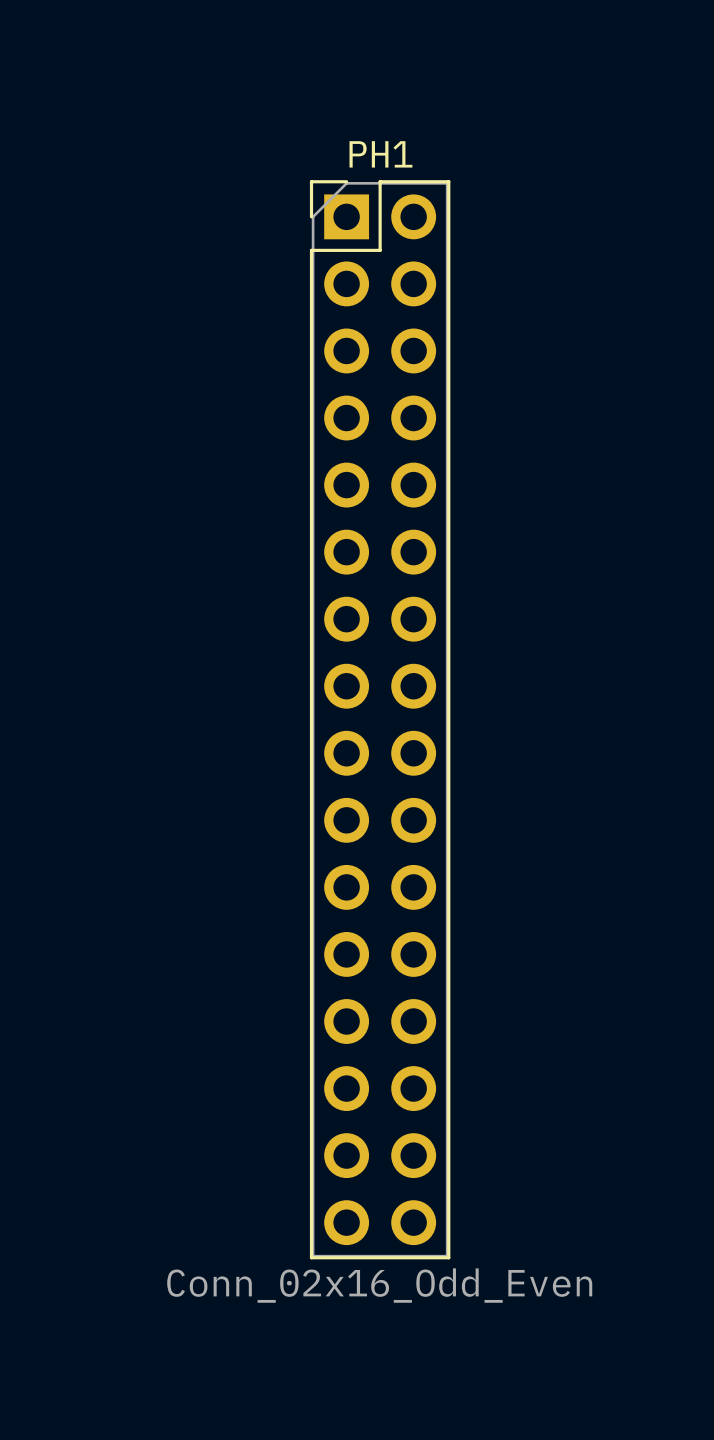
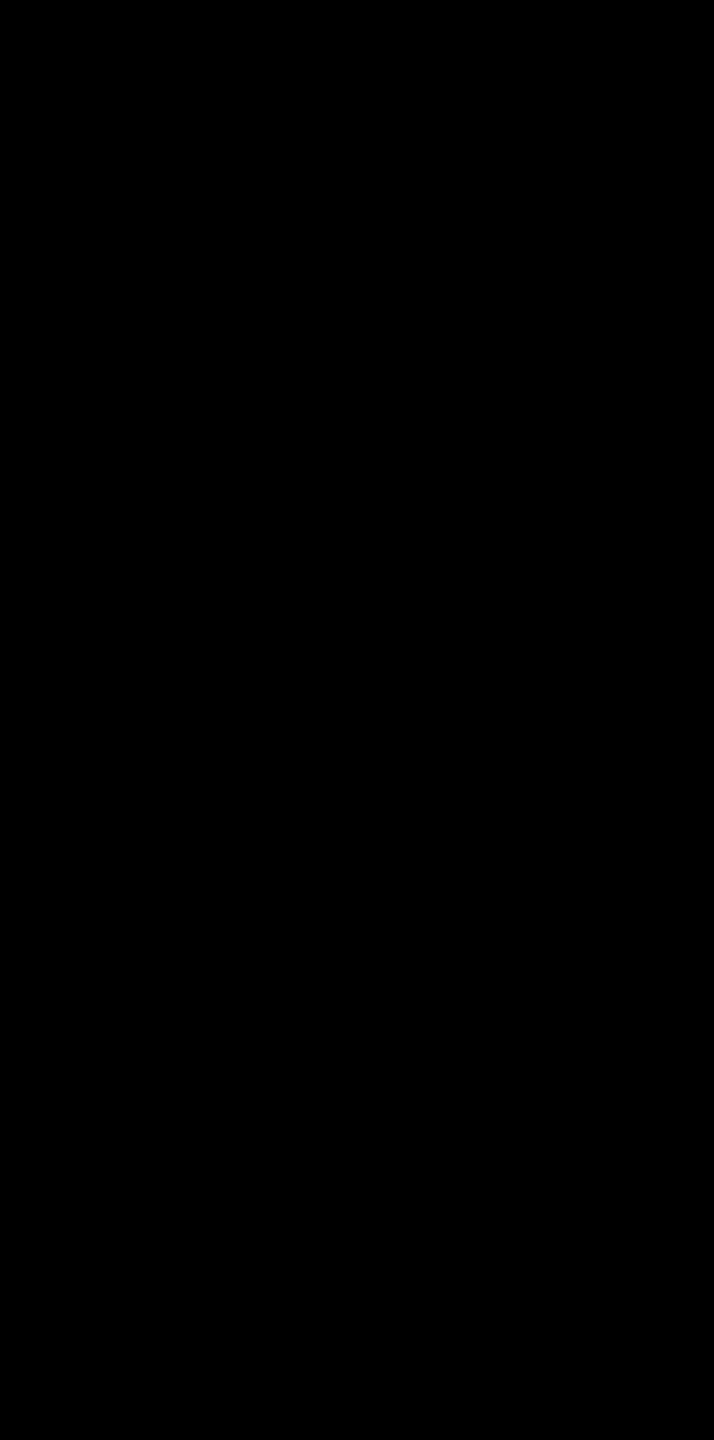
PH1: Conn_02x16_Odd_Even (380, 719) -> none

